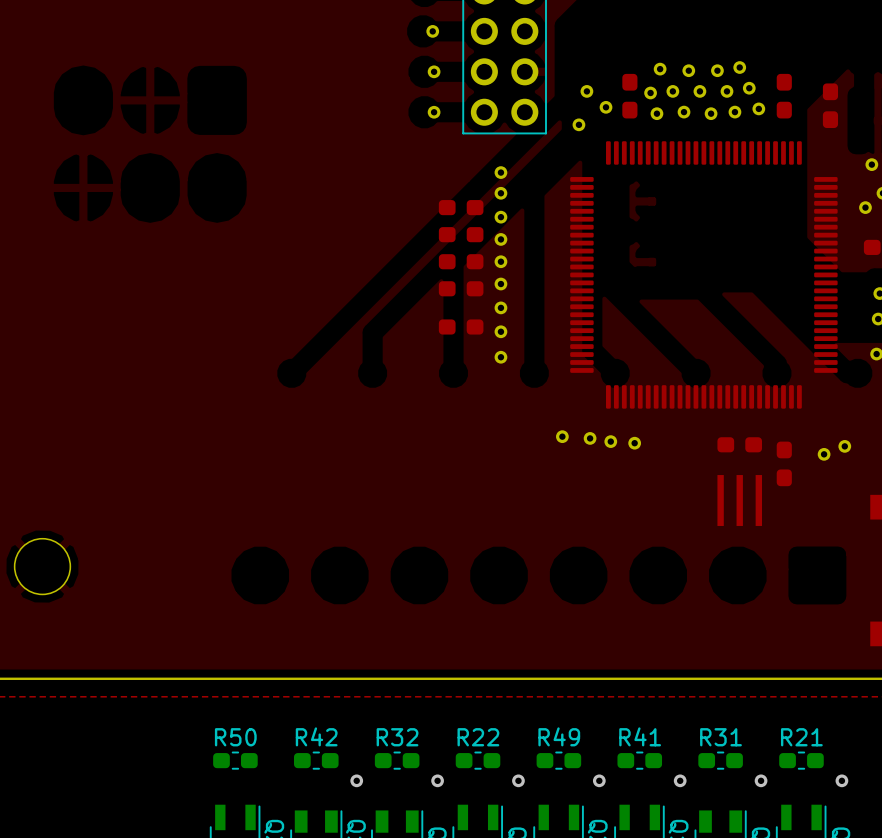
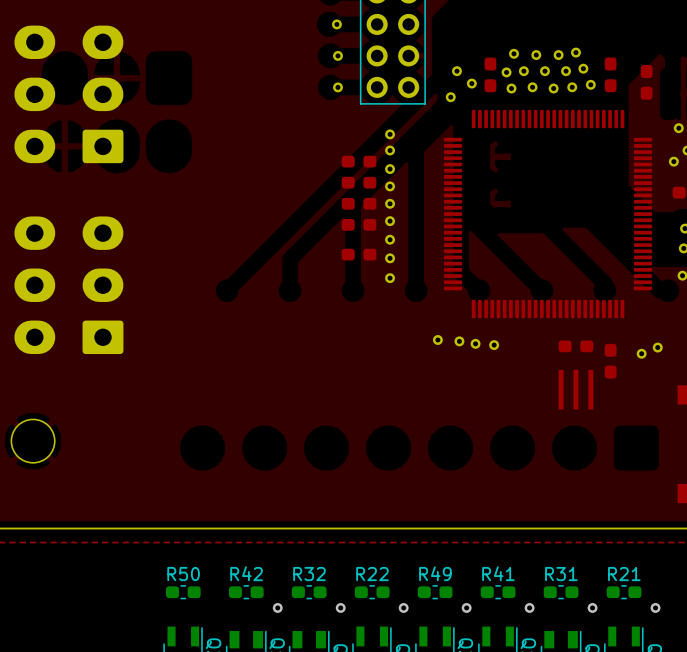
part: none -> (68, 94)
part: none -> (68, 285)

